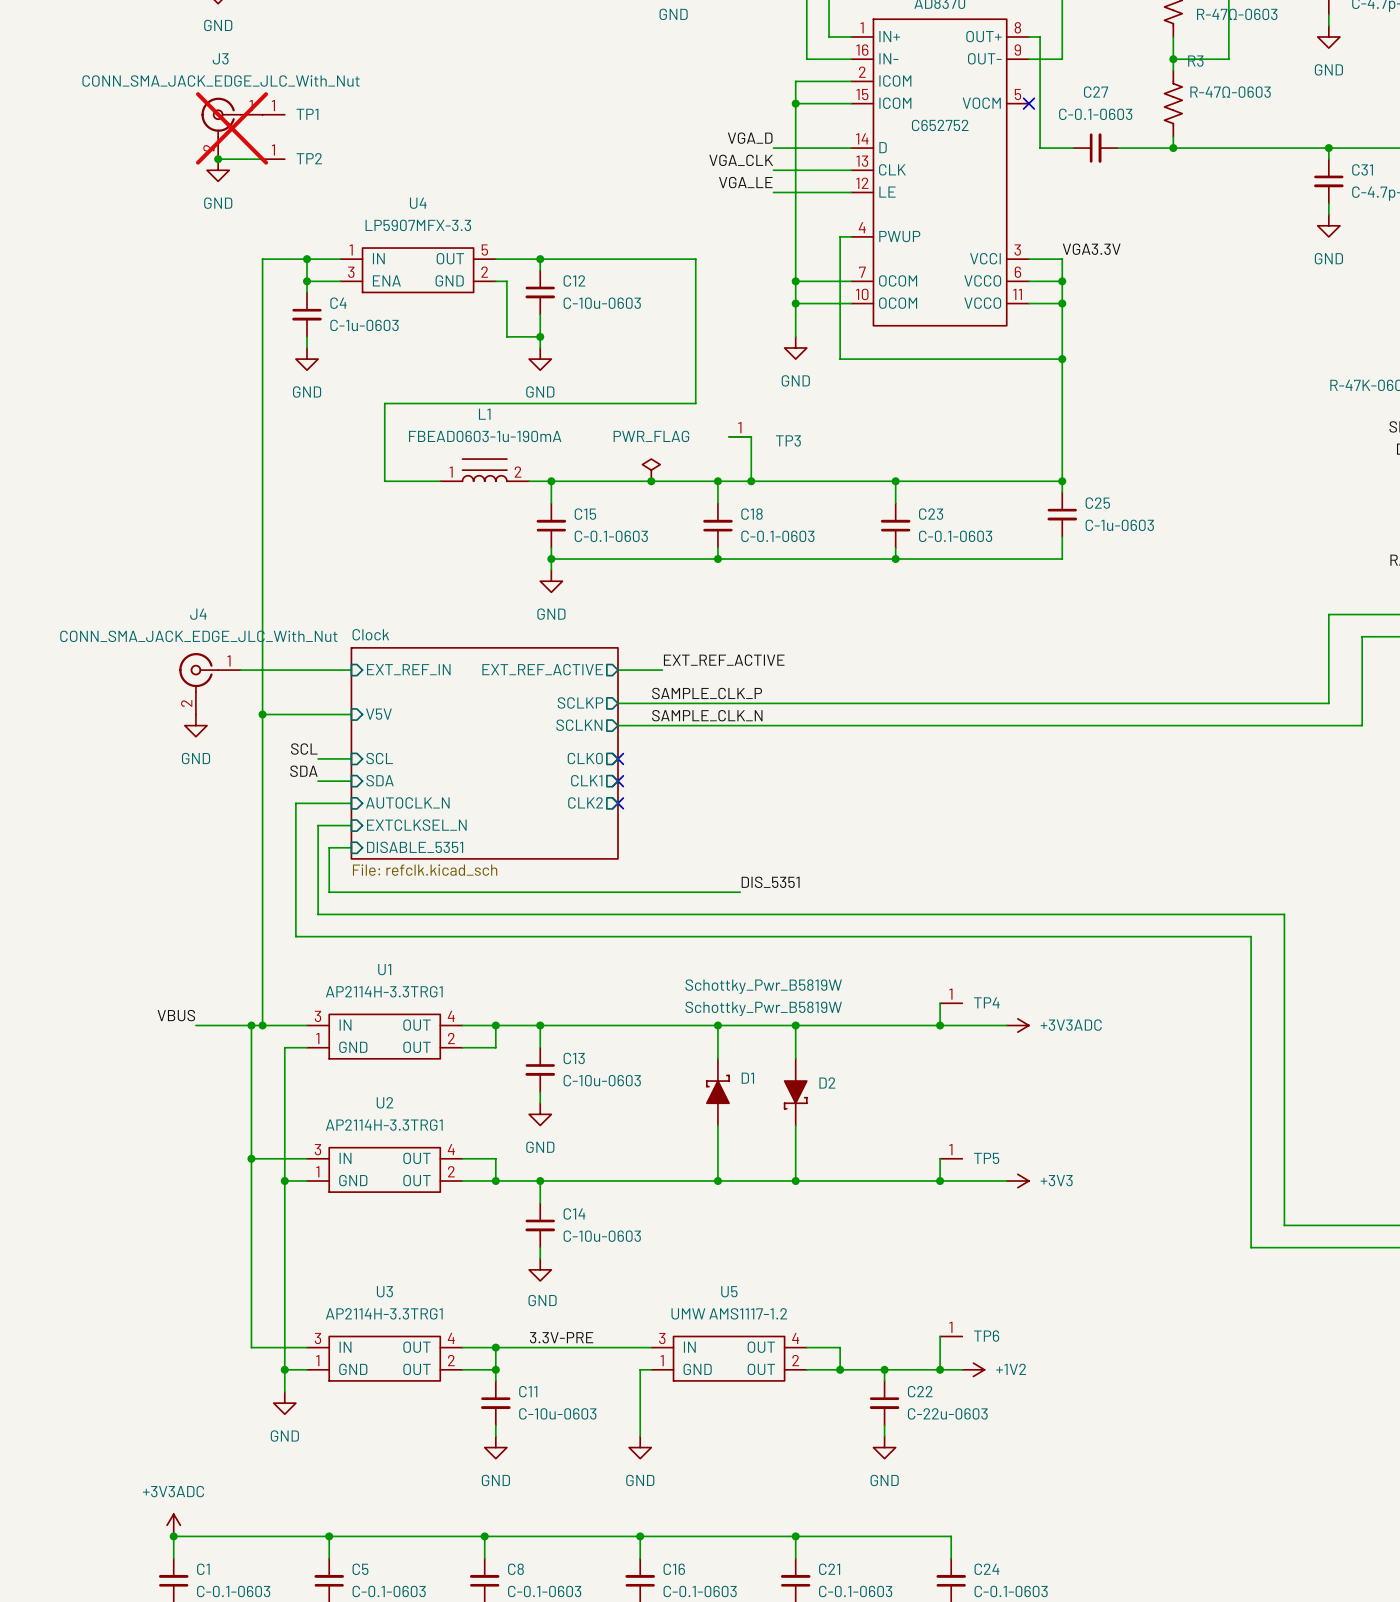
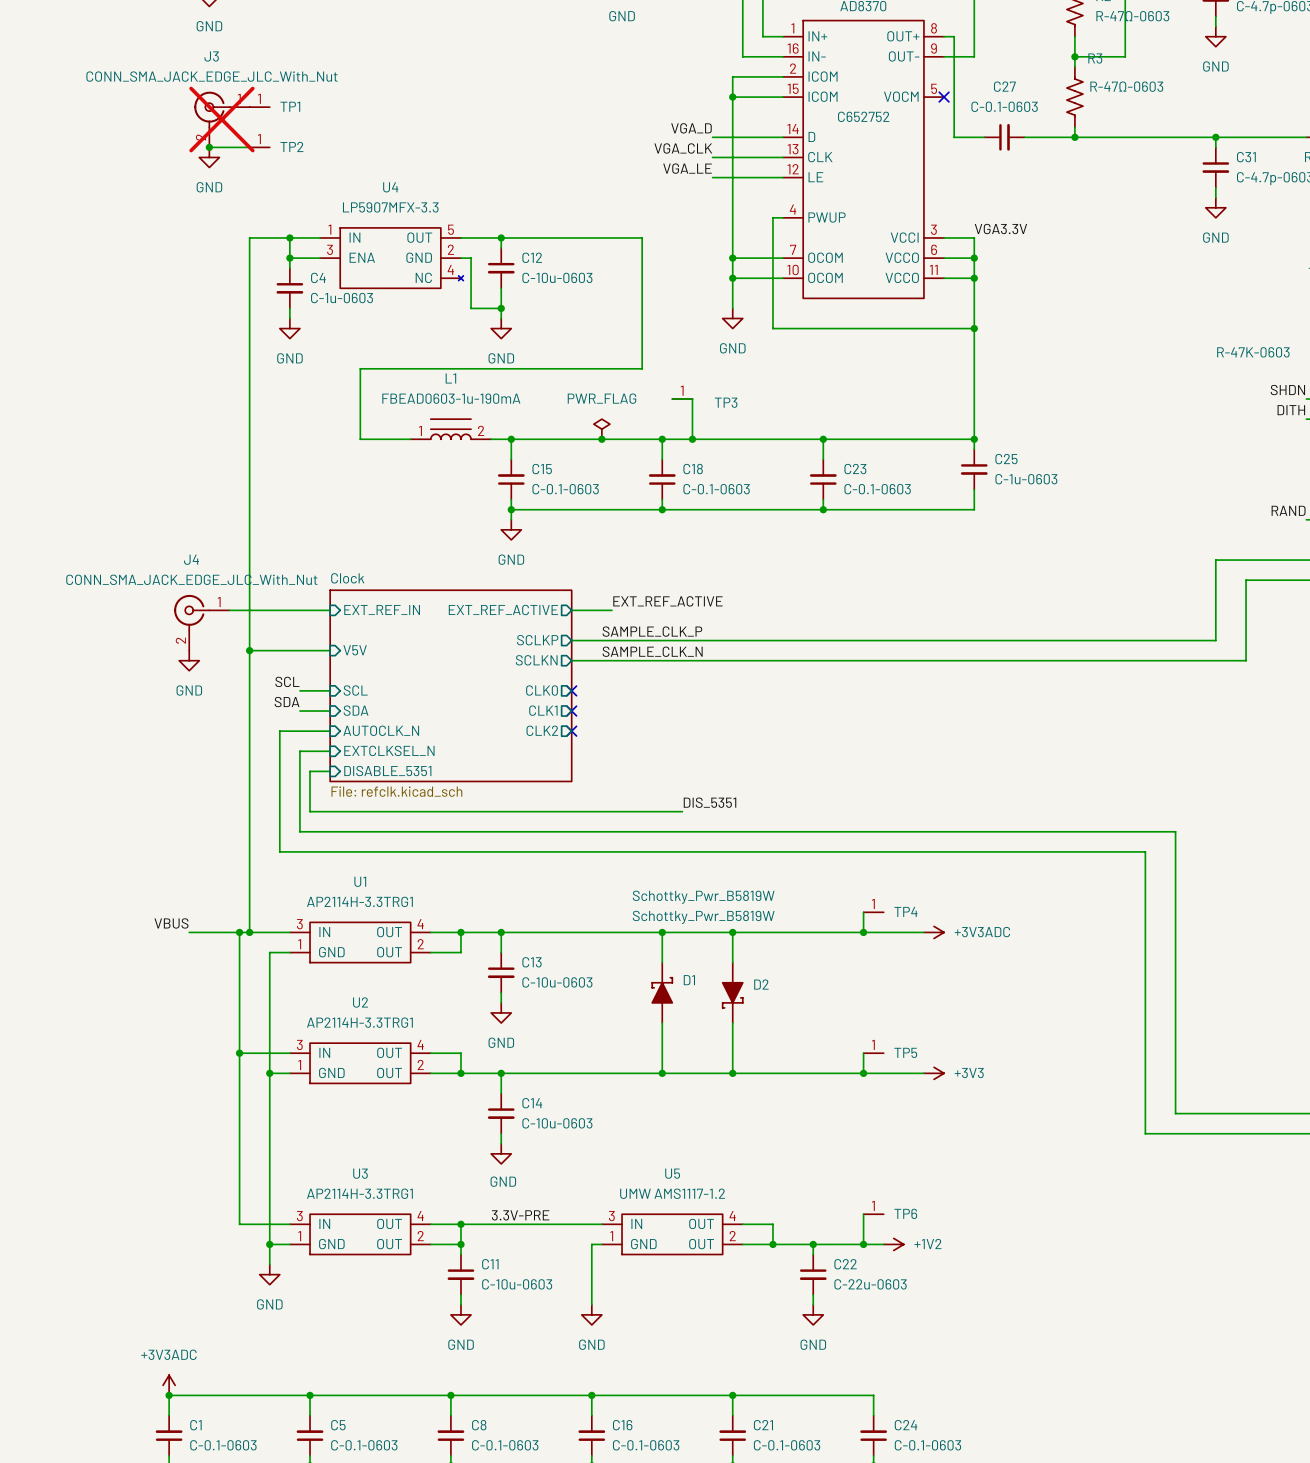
U4 symbol: [340, 248, 496, 293] -> [320, 227, 464, 289]

